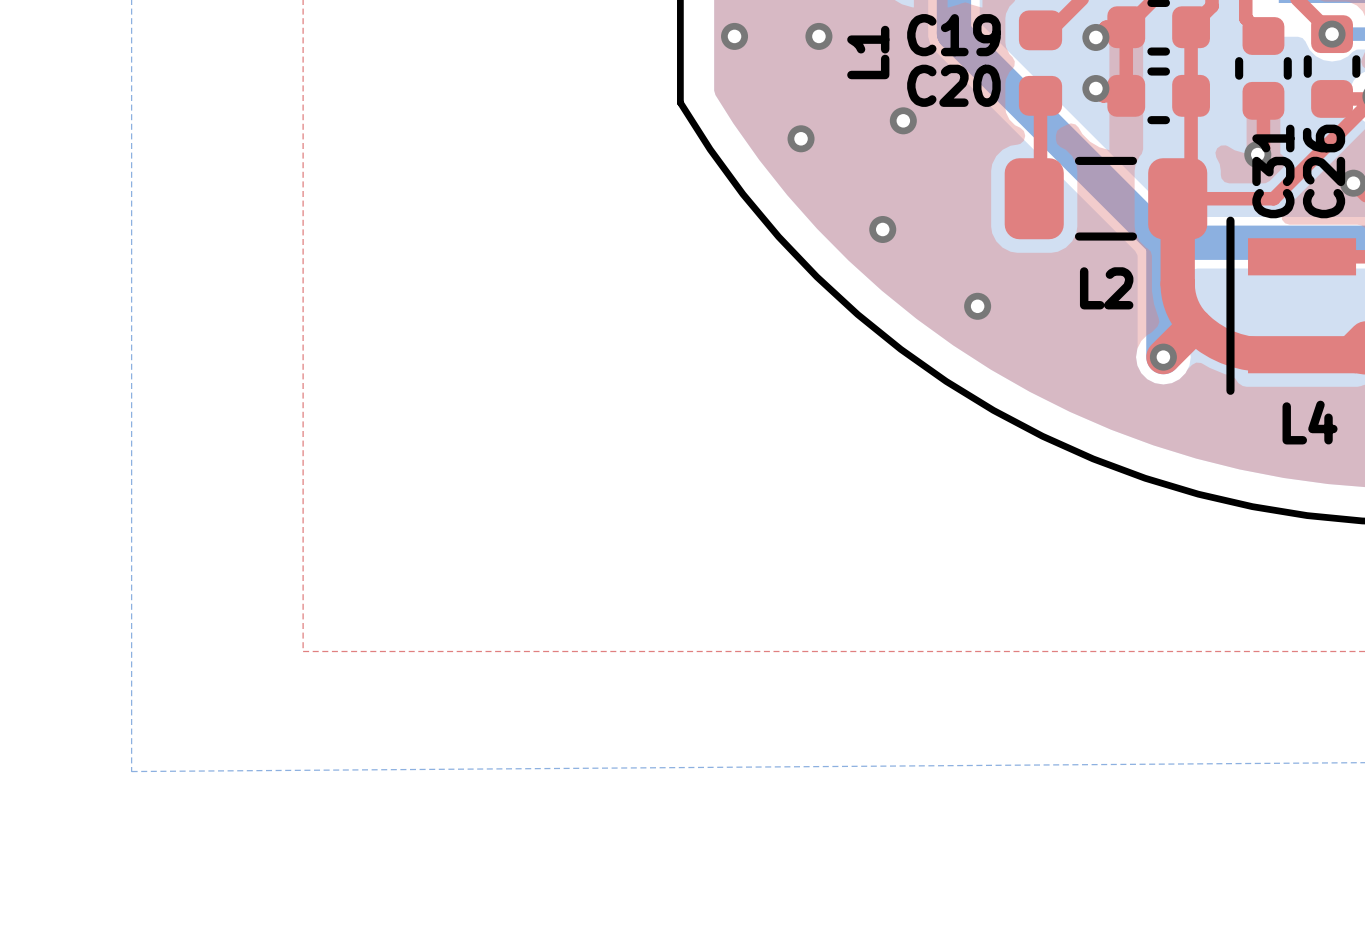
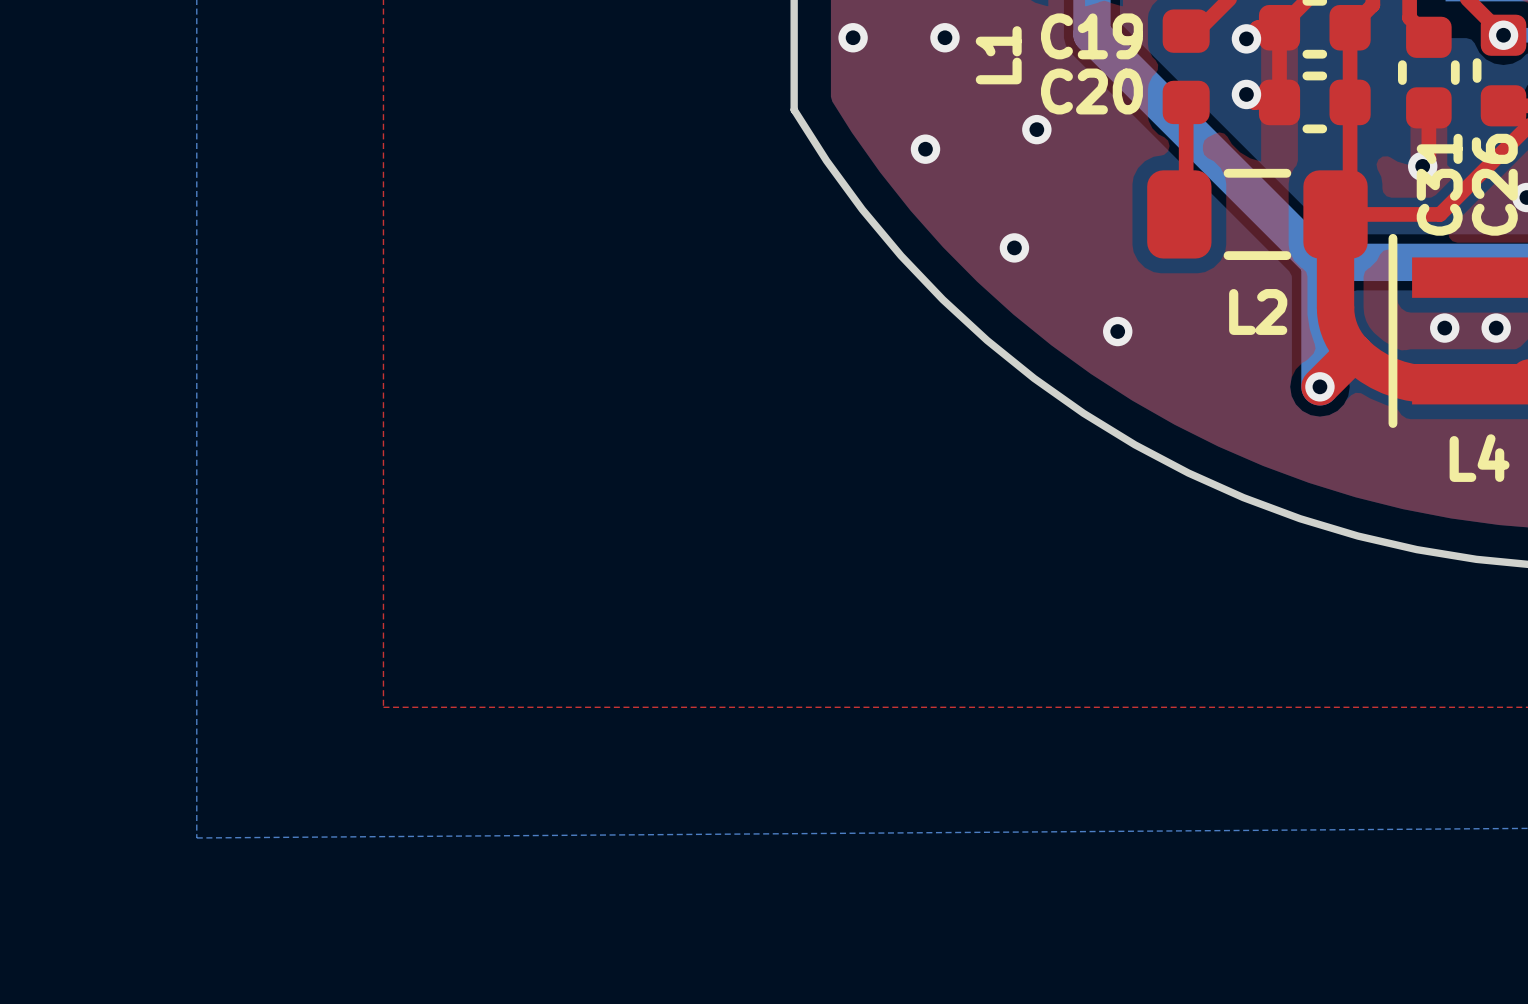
via: none -> (1444, 328)
via: none -> (1496, 328)

